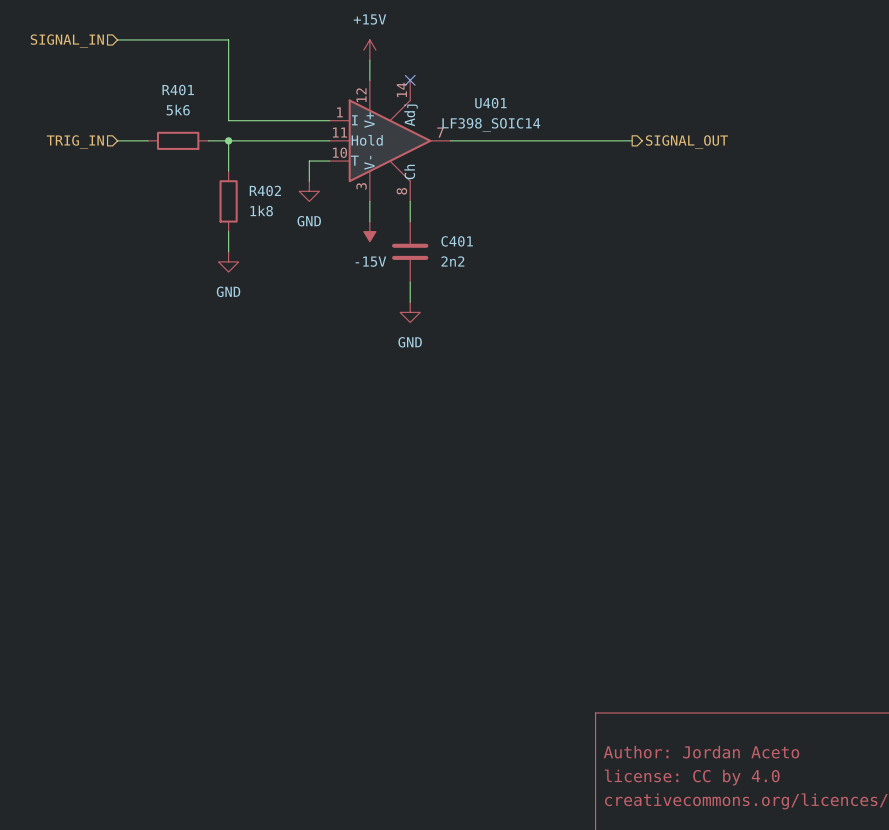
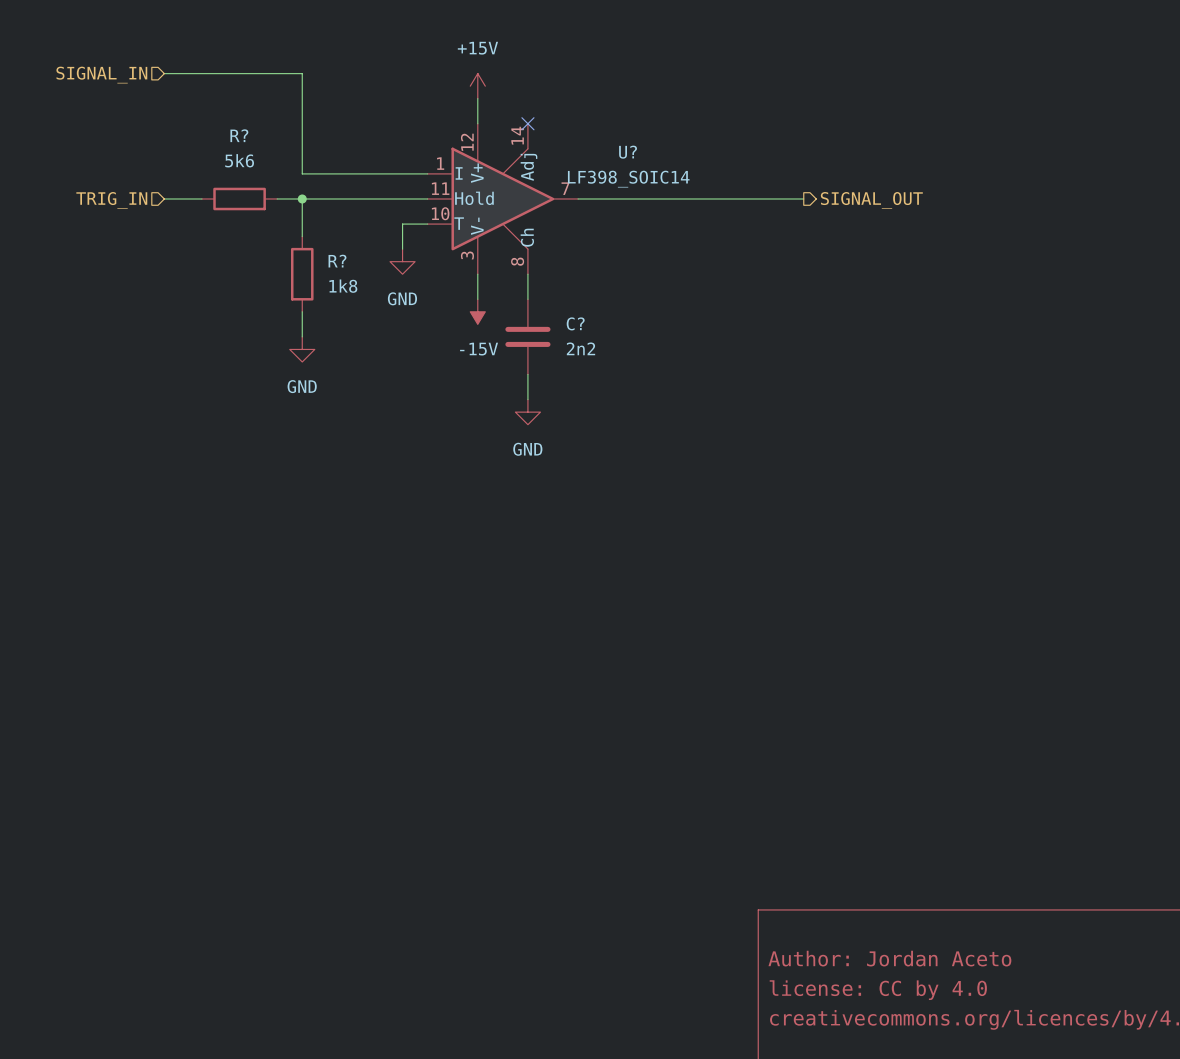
R401 name: R401 (178, 90) -> R? (239, 135)
U401 name: U401 (490, 103) -> U? (628, 152)
R402 name: R402 (265, 190) -> R? (337, 261)
C401 name: C401 (457, 241) -> C? (575, 323)

